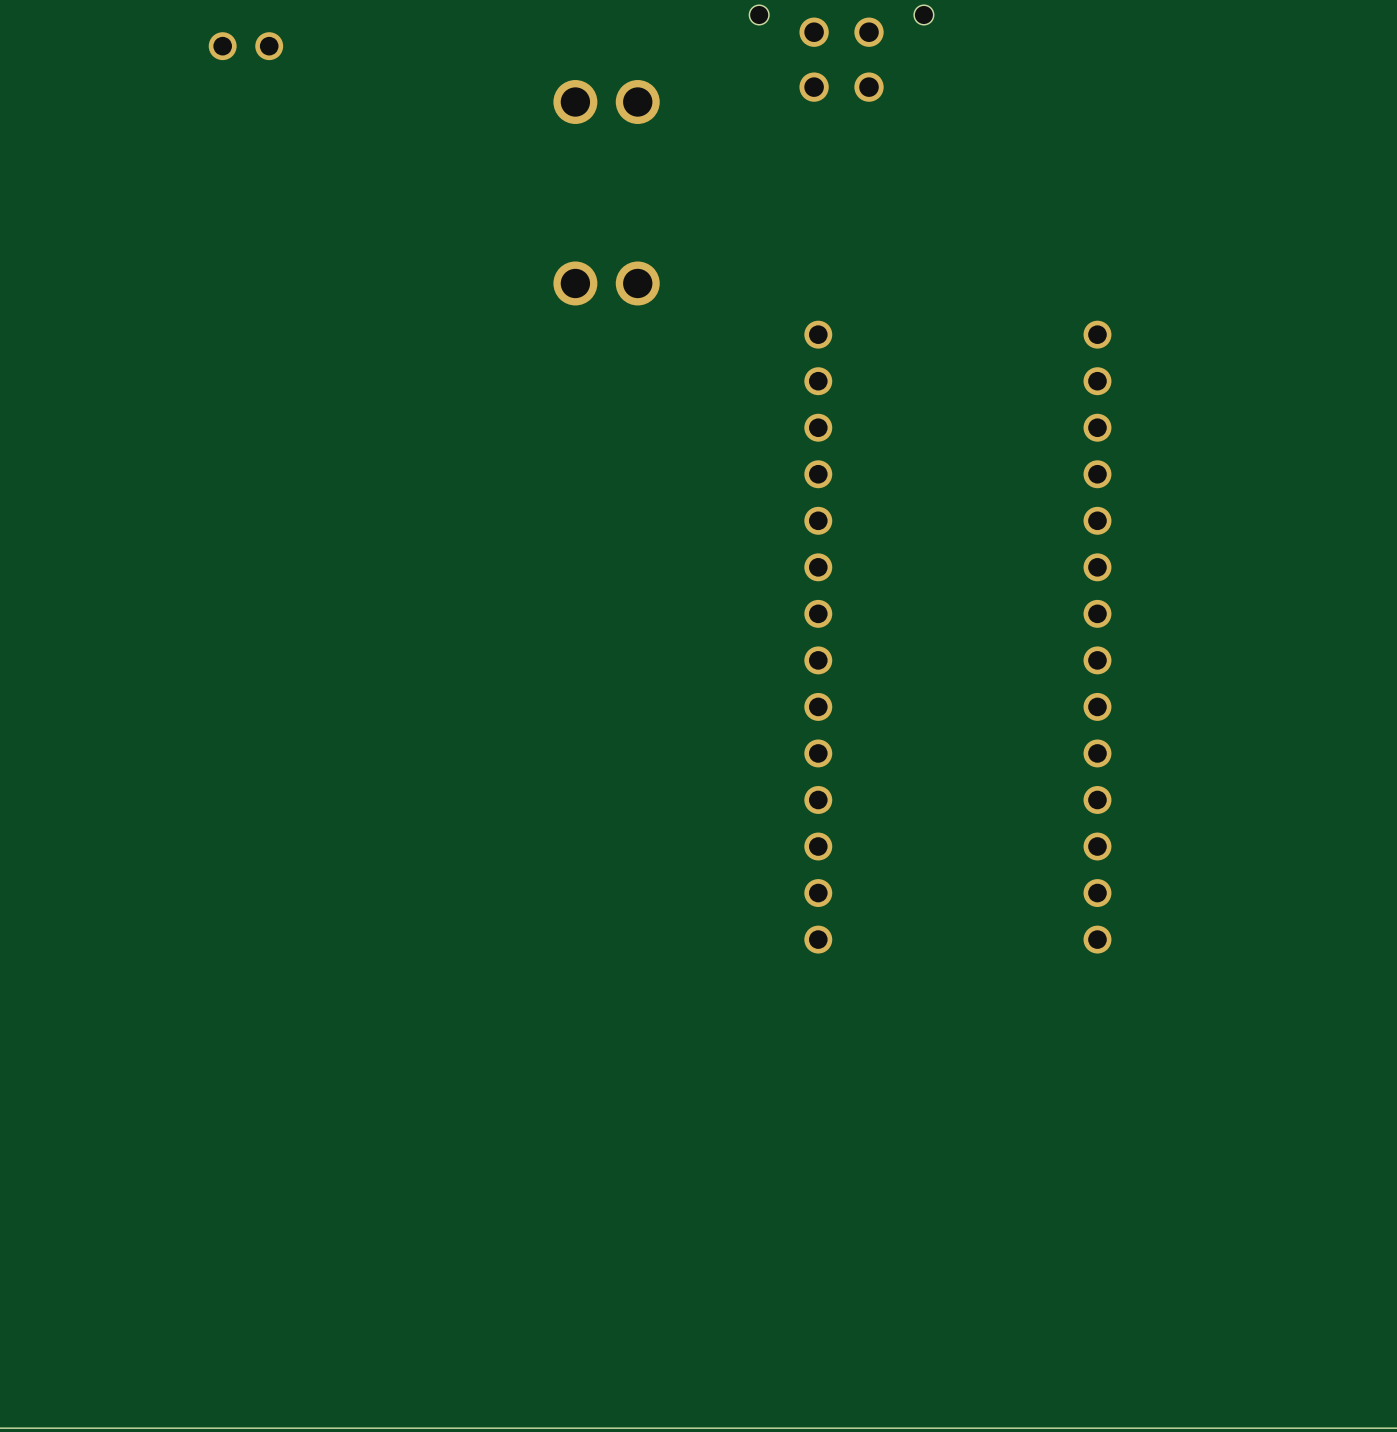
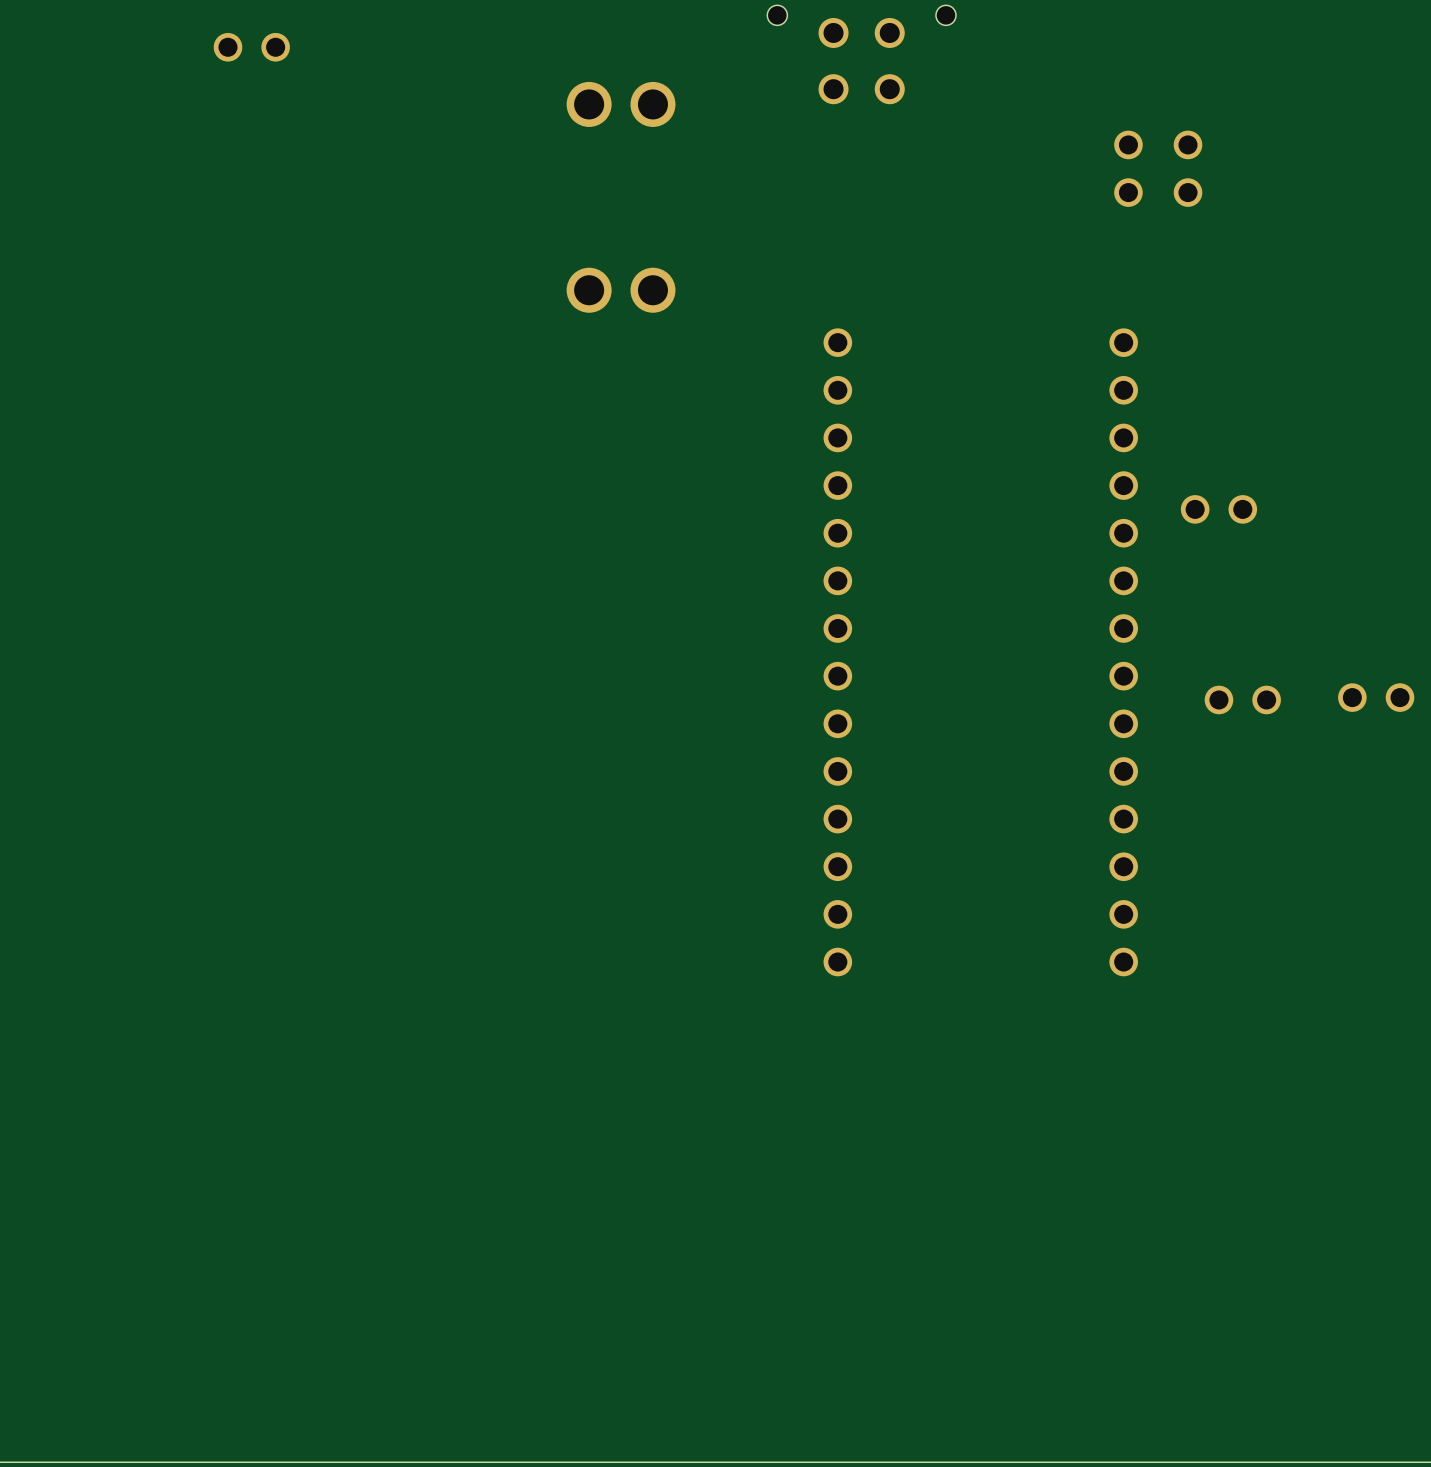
part: none -> (1128, 168)
part: none -> (1188, 168)
part: none -> (1218, 509)
part: none -> (1376, 697)
part: none -> (1242, 699)

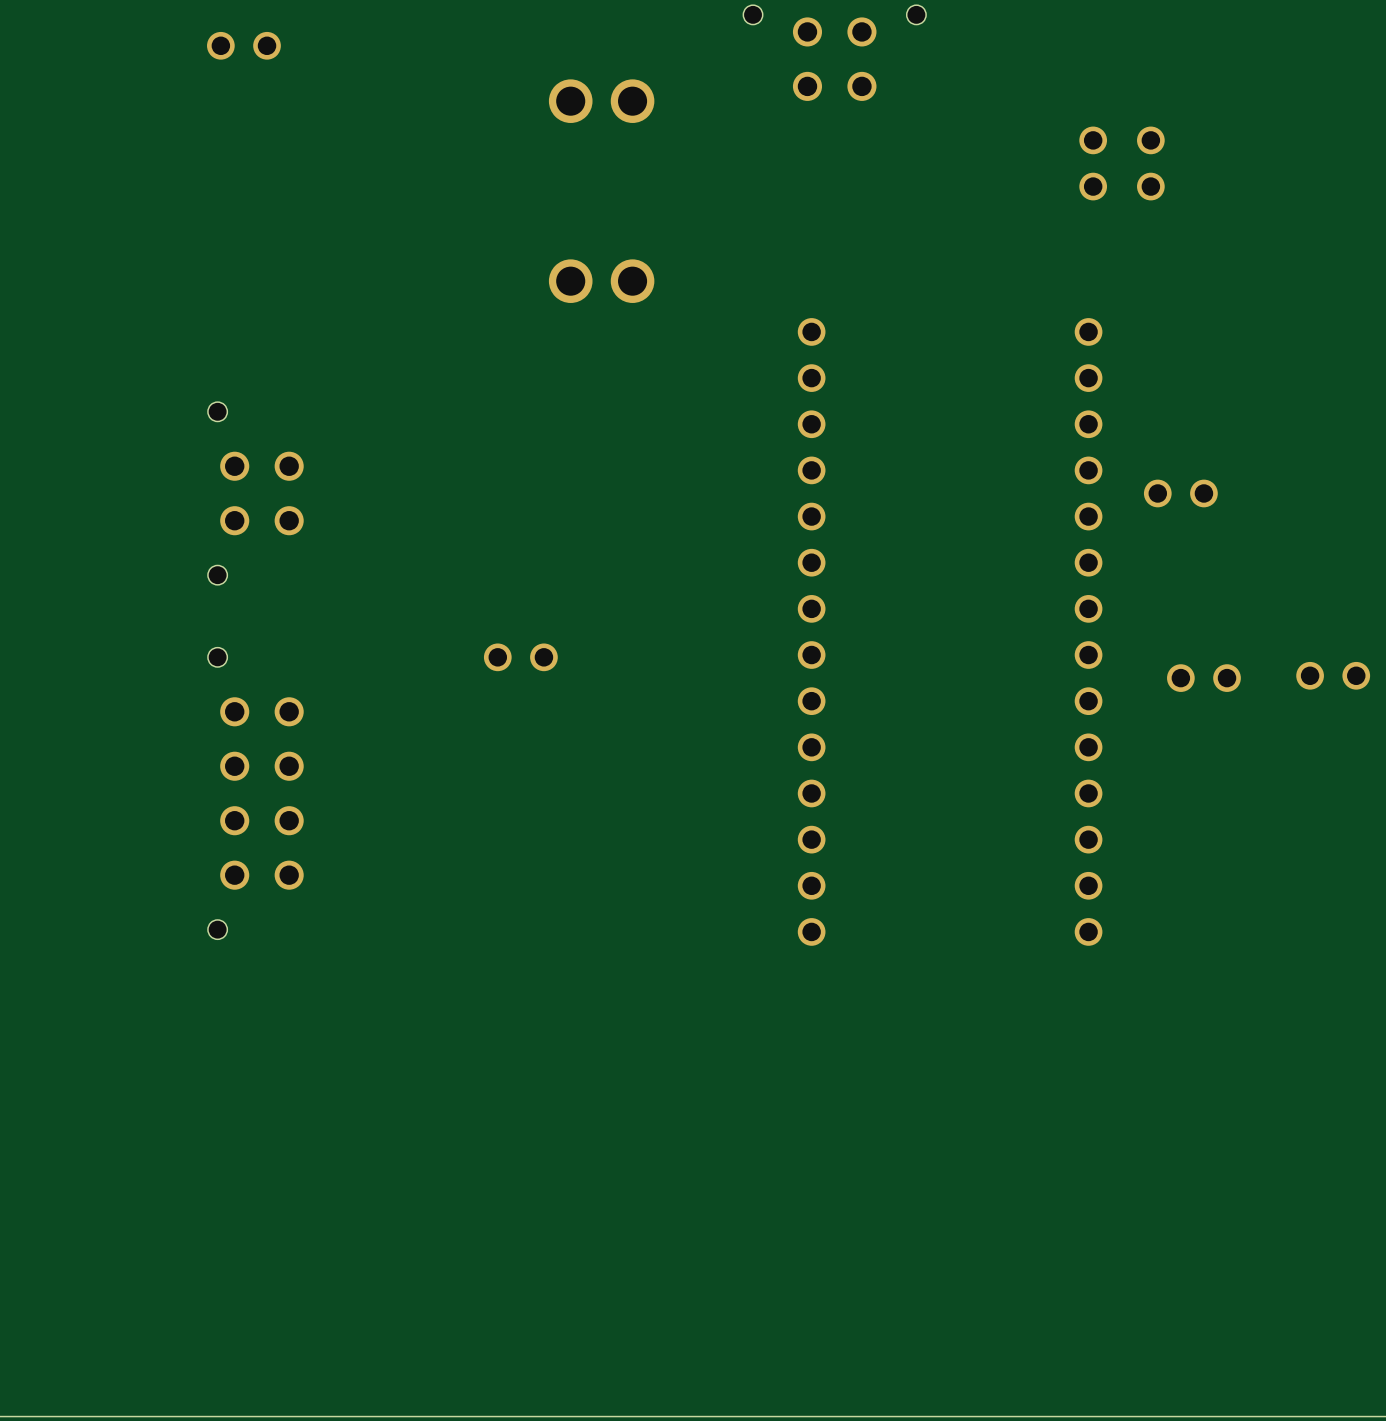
part: none -> (255, 493)
part: none -> (520, 657)
part: none -> (255, 793)

